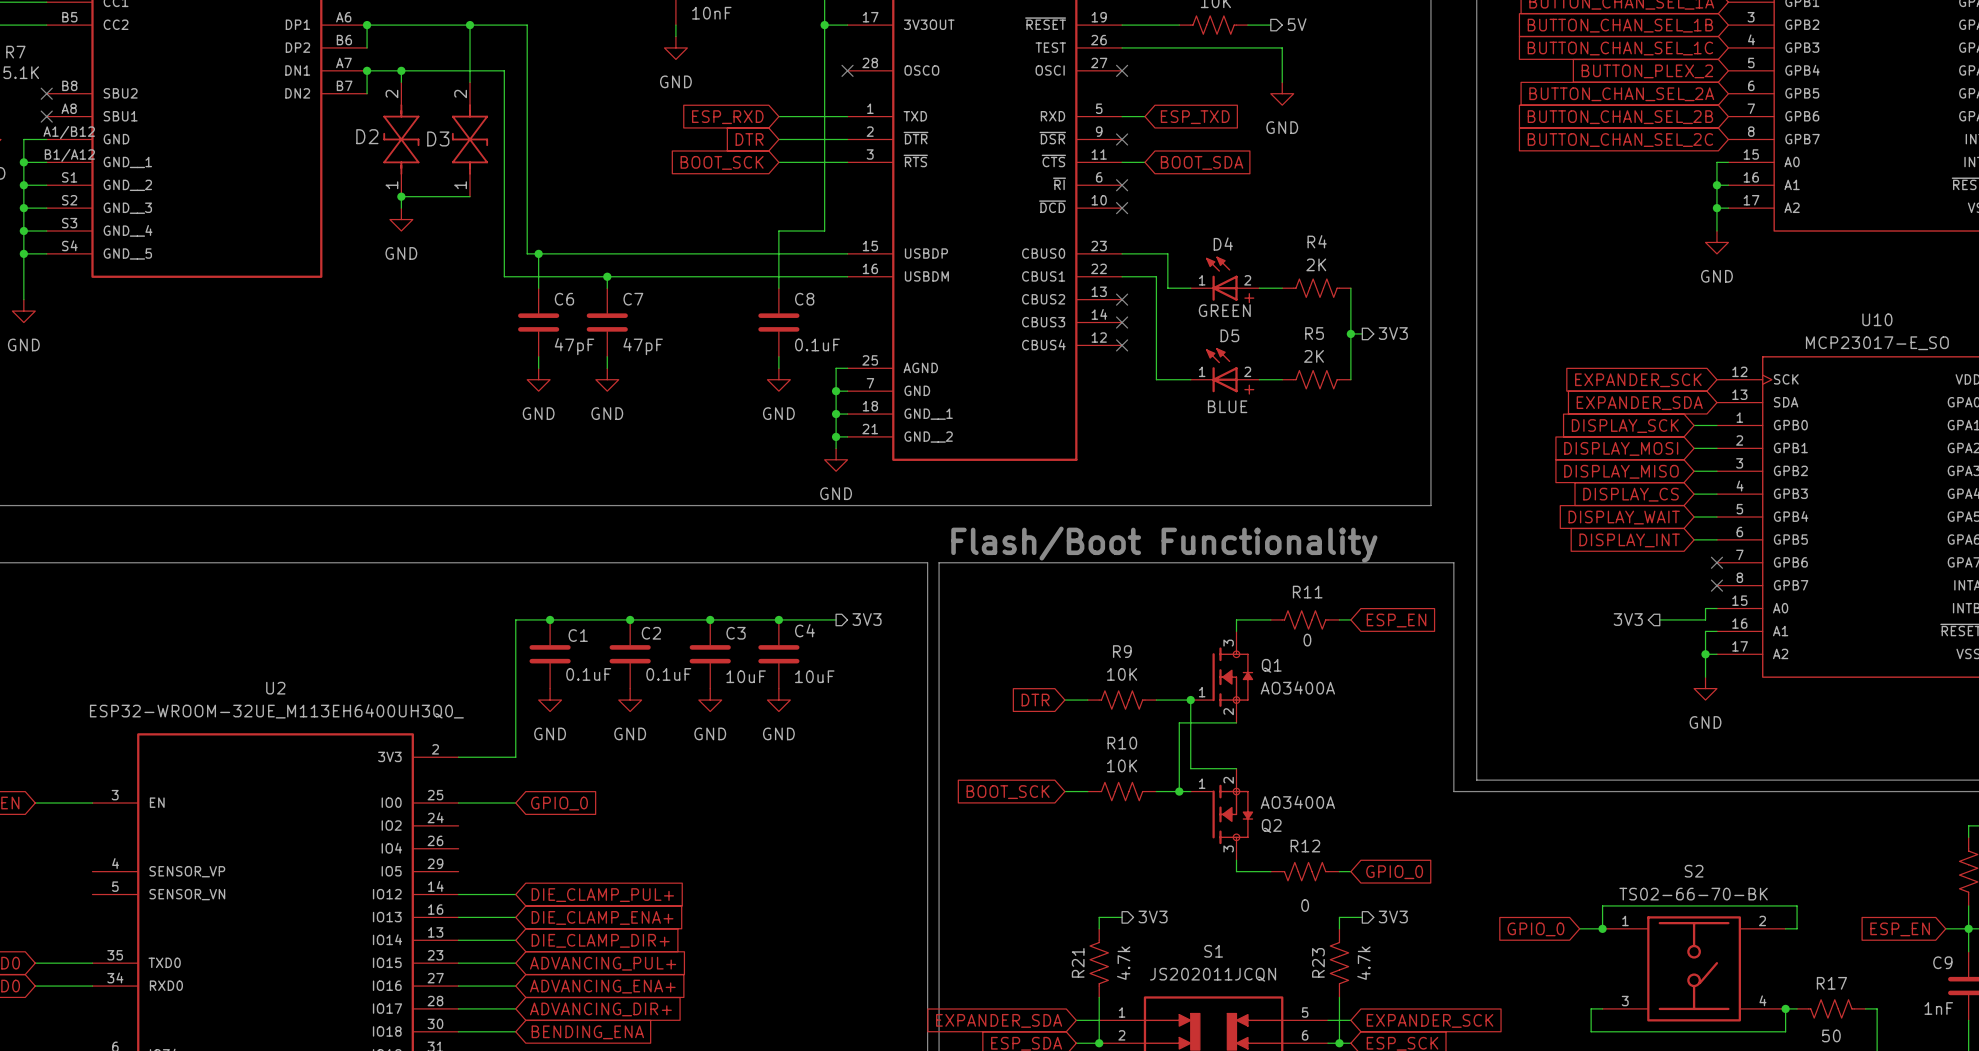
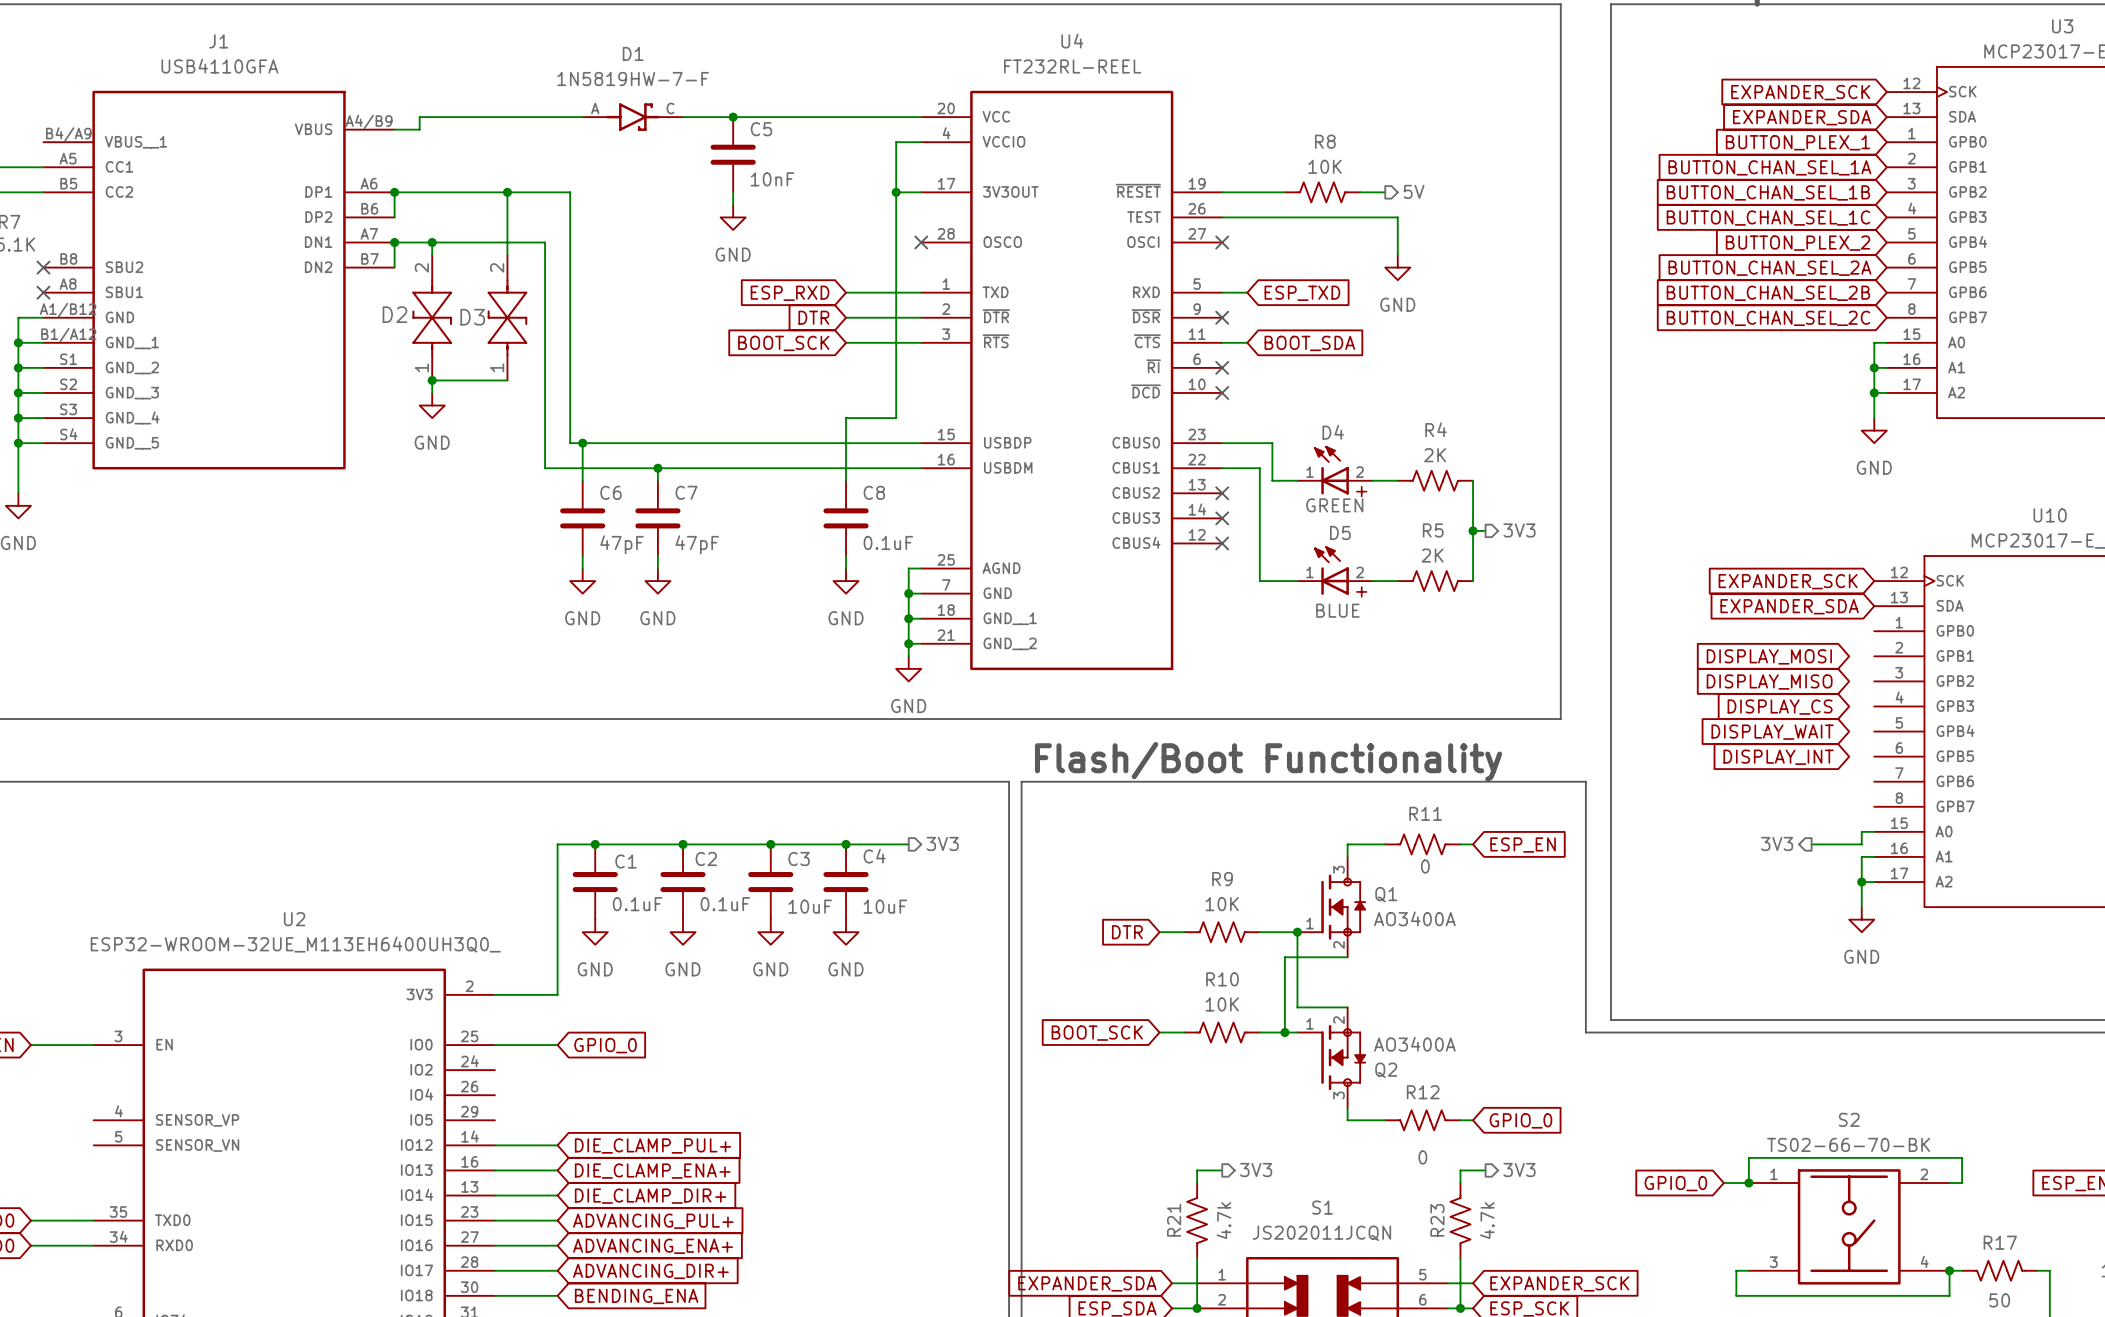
wire: (1694, 425) (1716, 425) -> none
global label: DISPLAY_SCK (1625, 426) -> none
wire: (1694, 448) (1716, 448) -> none
wire: (1694, 471) (1716, 471) -> none
wire: (1694, 494) (1716, 494) -> none
wire: (1694, 517) (1716, 517) -> none
wire: (1694, 539) (1716, 539) -> none
no-connect mark: (1716, 562) -> none
no-connect mark: (1716, 585) -> none

